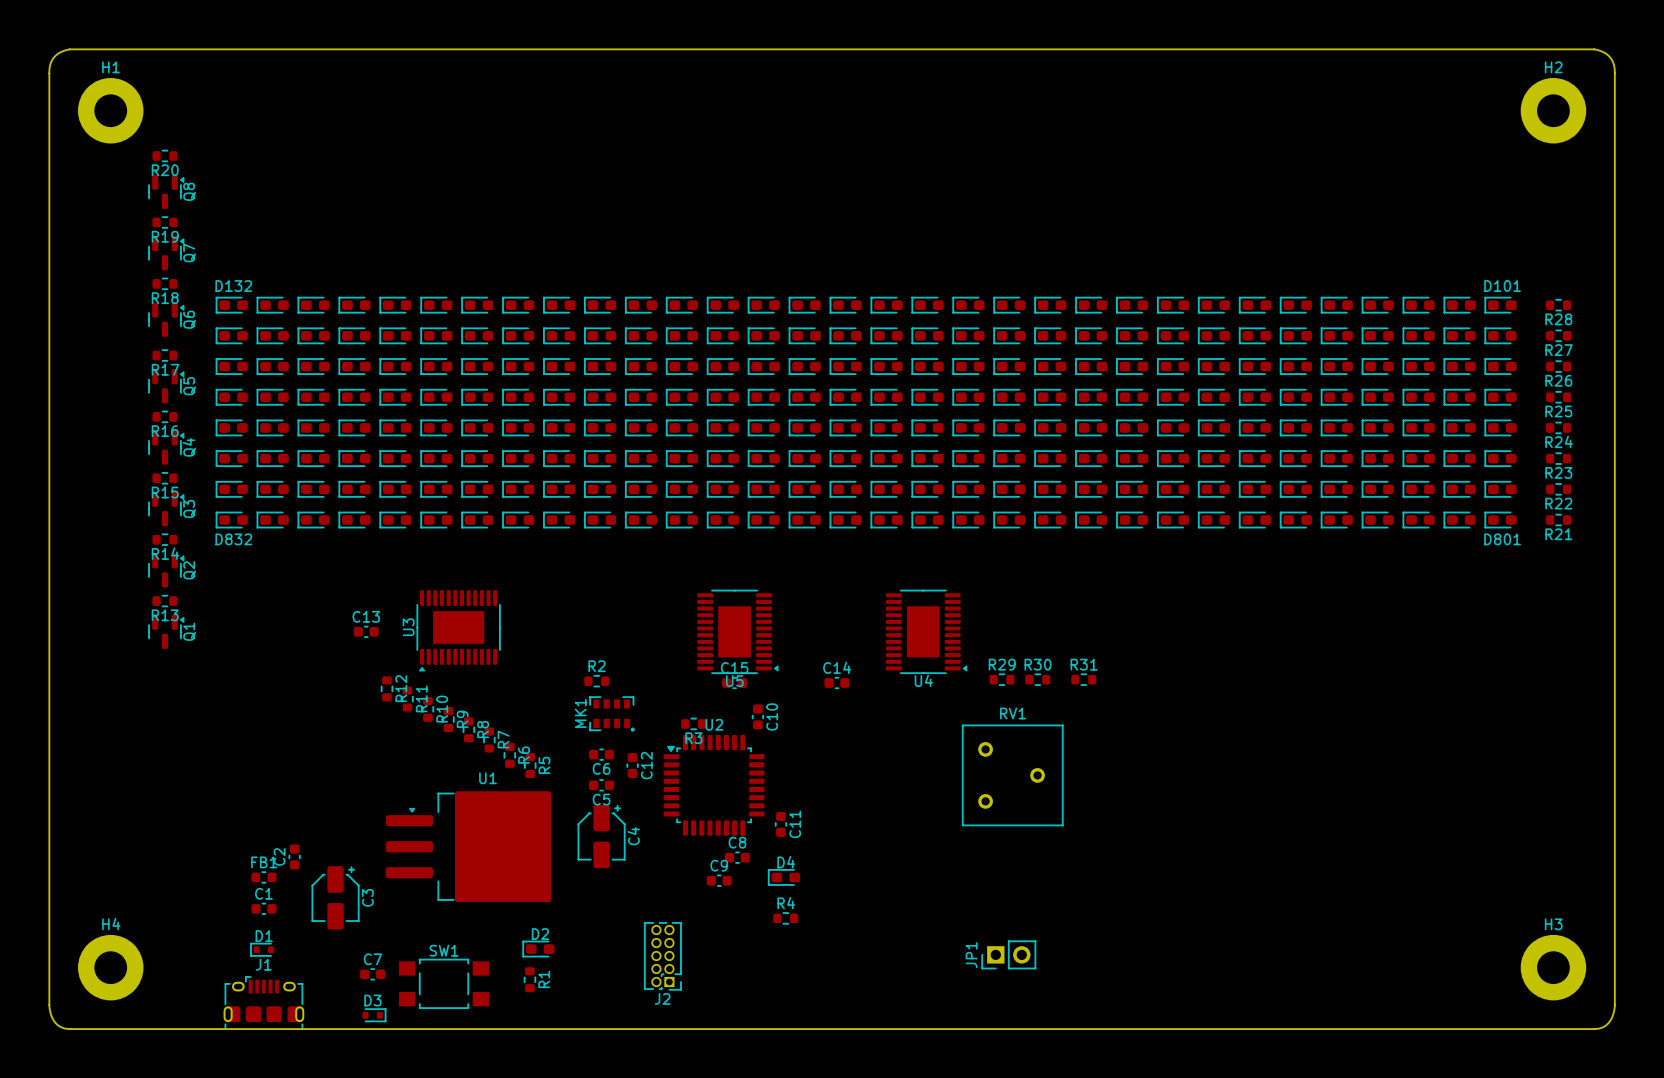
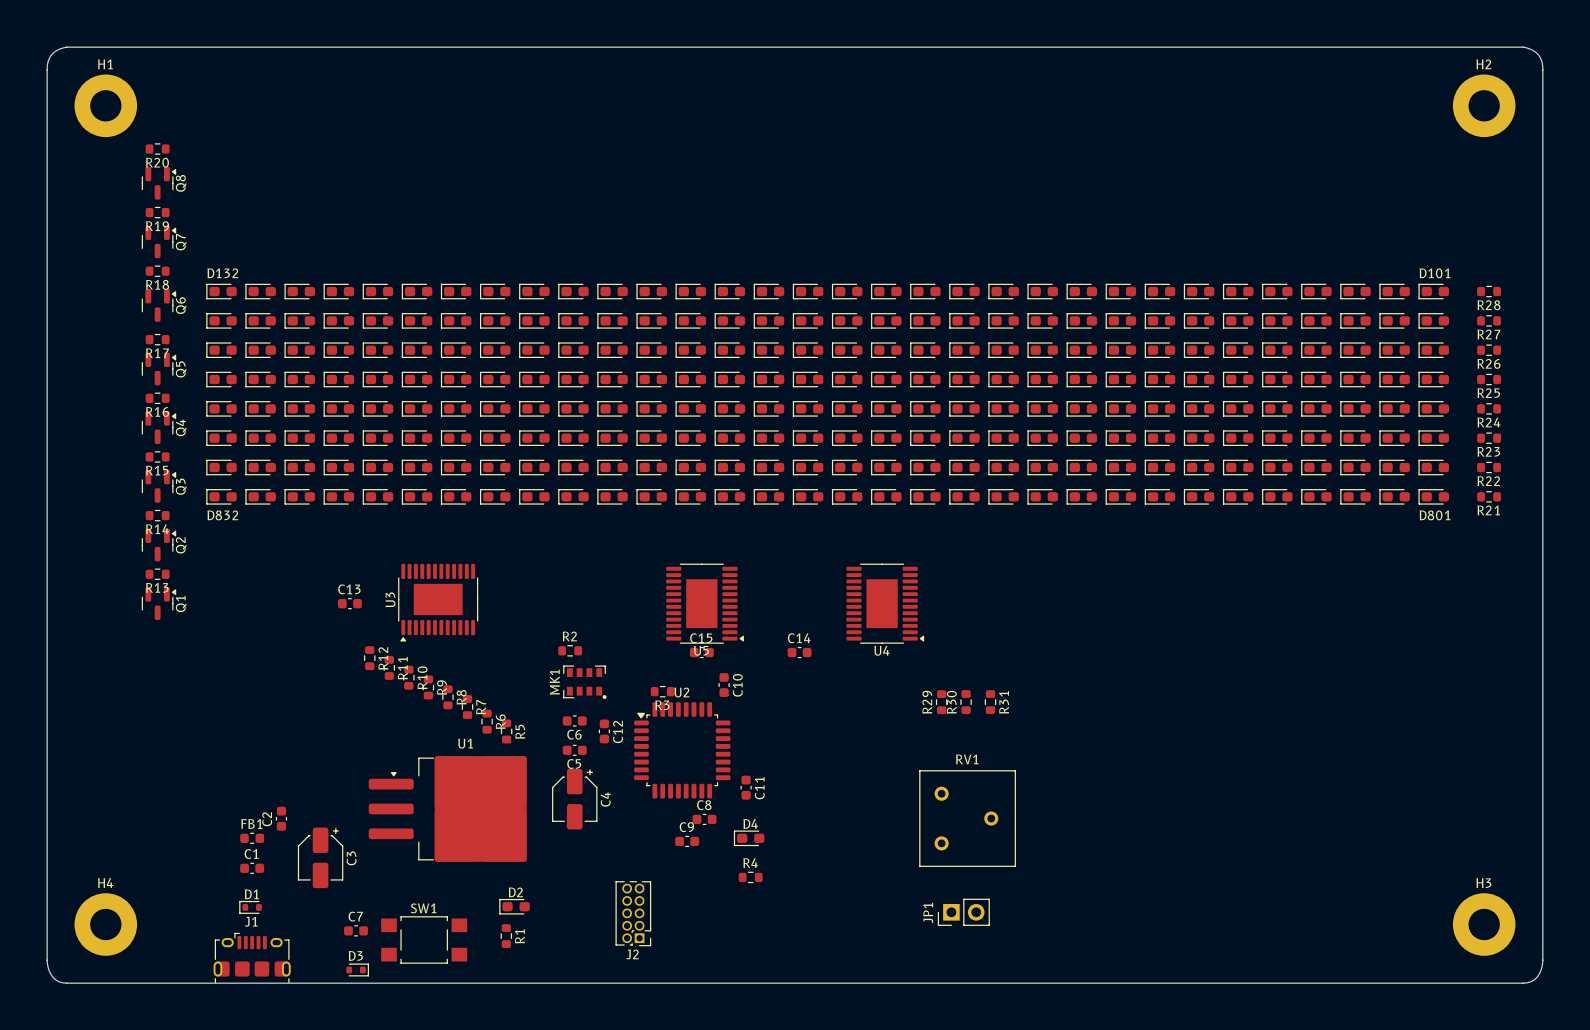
R29 name position: R29 (1002, 664) -> R29 (927, 702)
R30 name position: R30 (1038, 664) -> R30 (951, 702)
R29 rotation: 0° (1001, 679) -> 90° clockwise (941, 702)
R29 position: (1001, 679) -> (941, 702)
R30 rotation: 0° (1037, 679) -> 90° clockwise (966, 702)
R30 position: (1037, 679) -> (966, 702)
R31 rotation: 0° (1083, 679) -> 90° clockwise (990, 702)
R31 position: (1083, 679) -> (990, 702)
RV1 position: (1012, 775) -> (967, 818)

